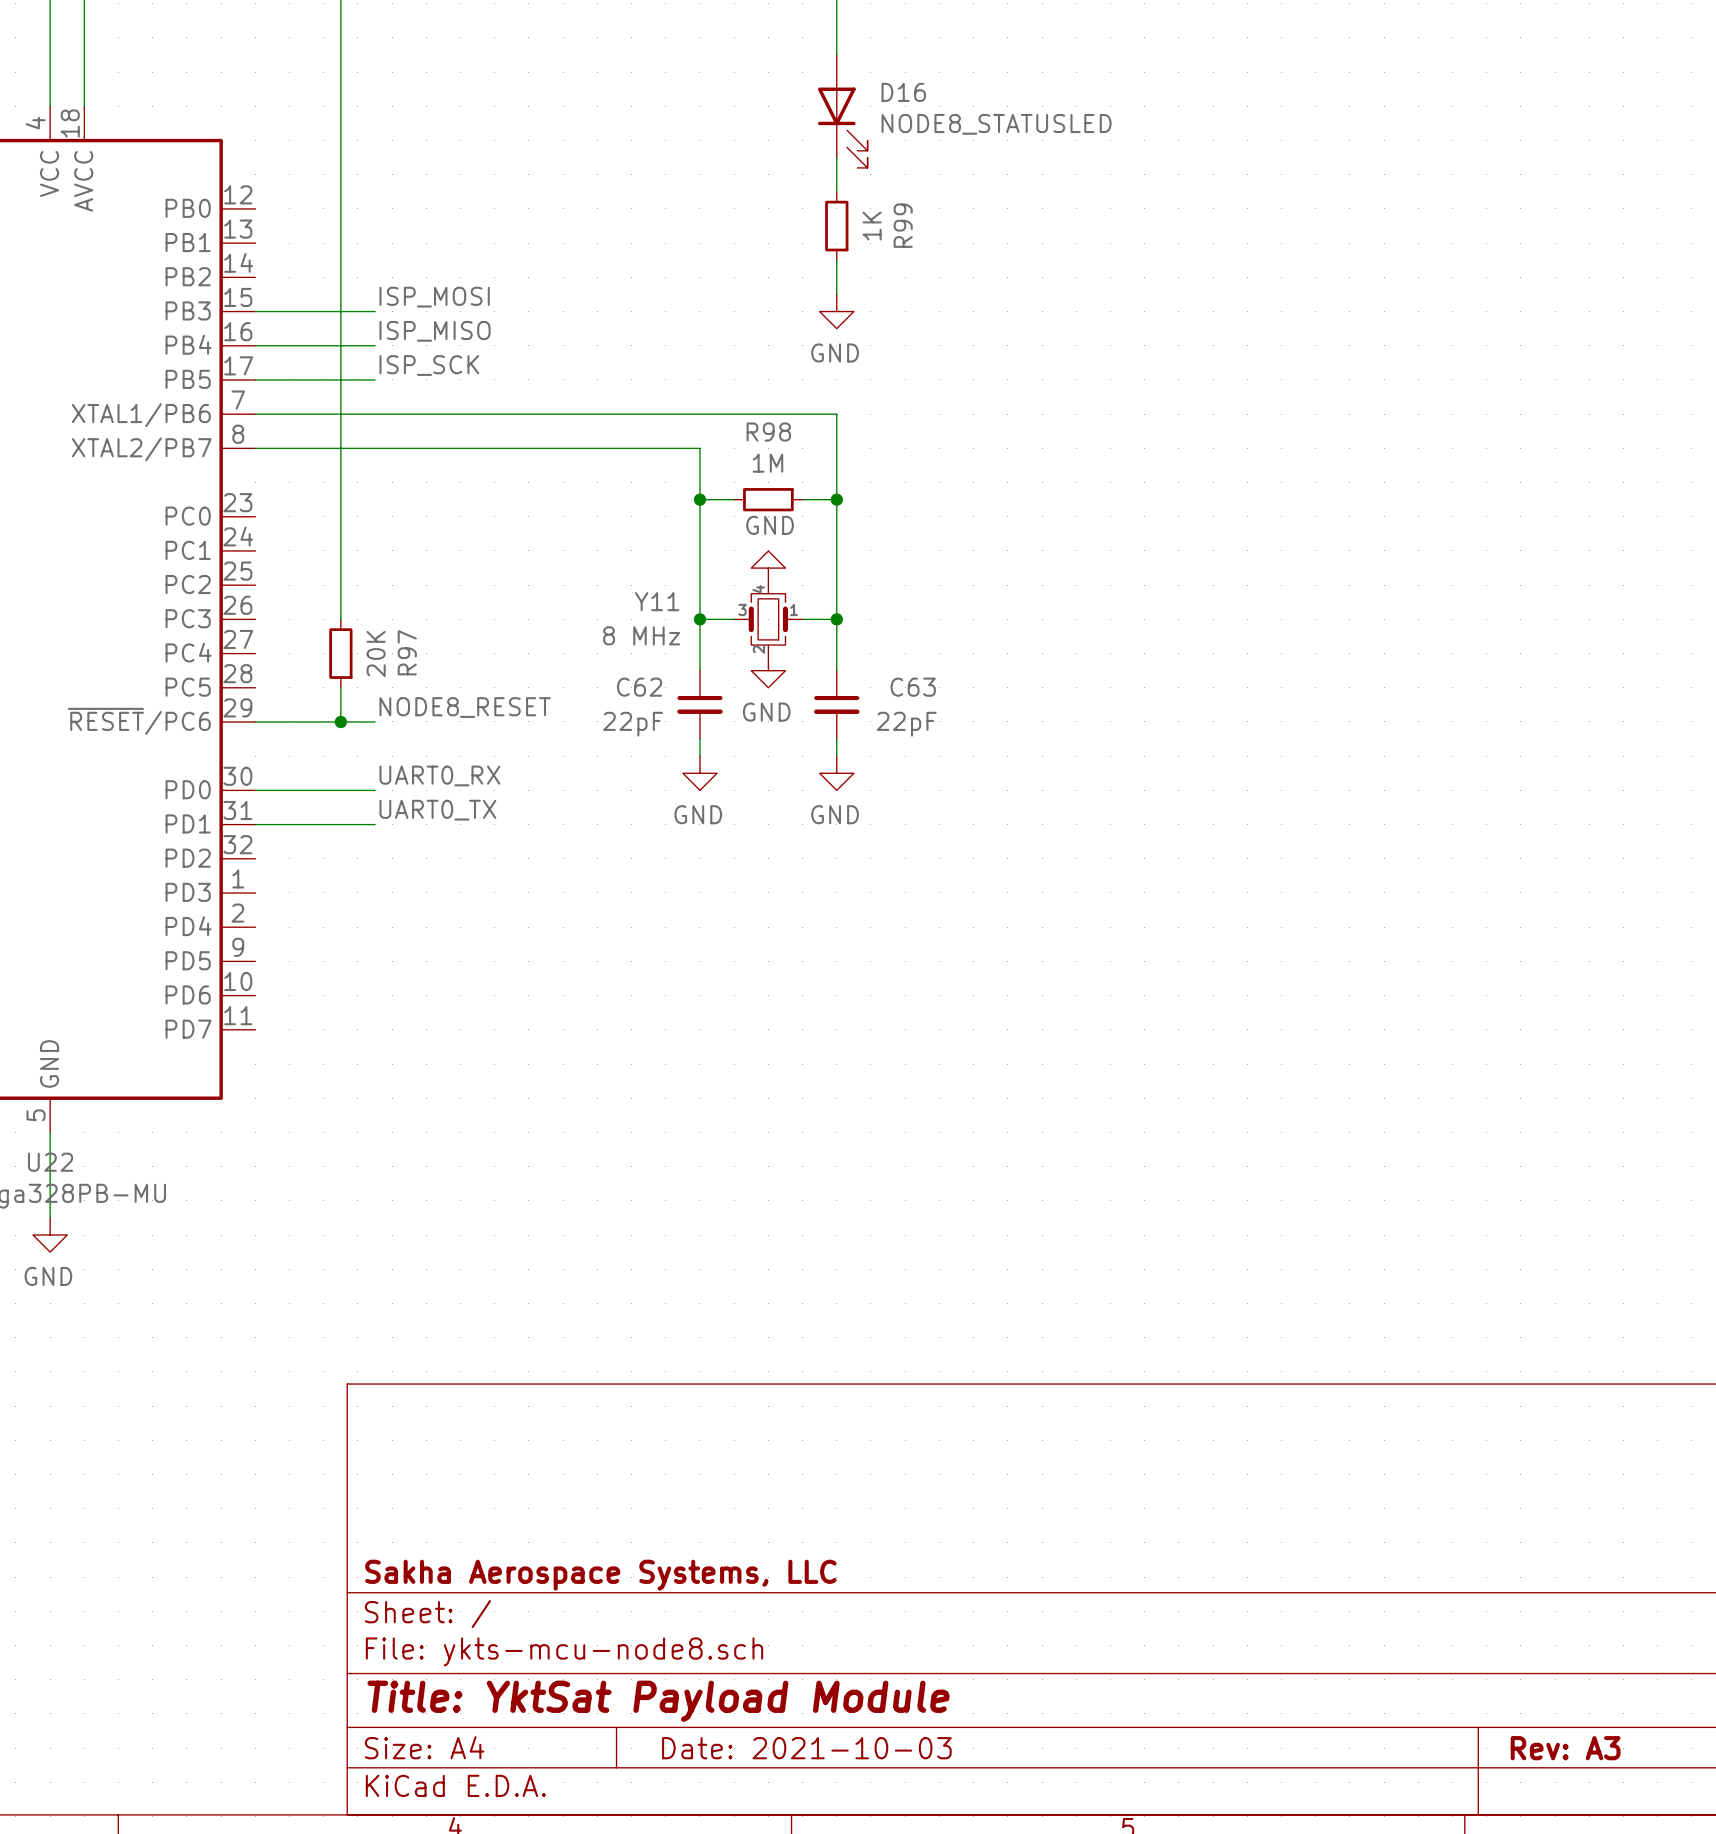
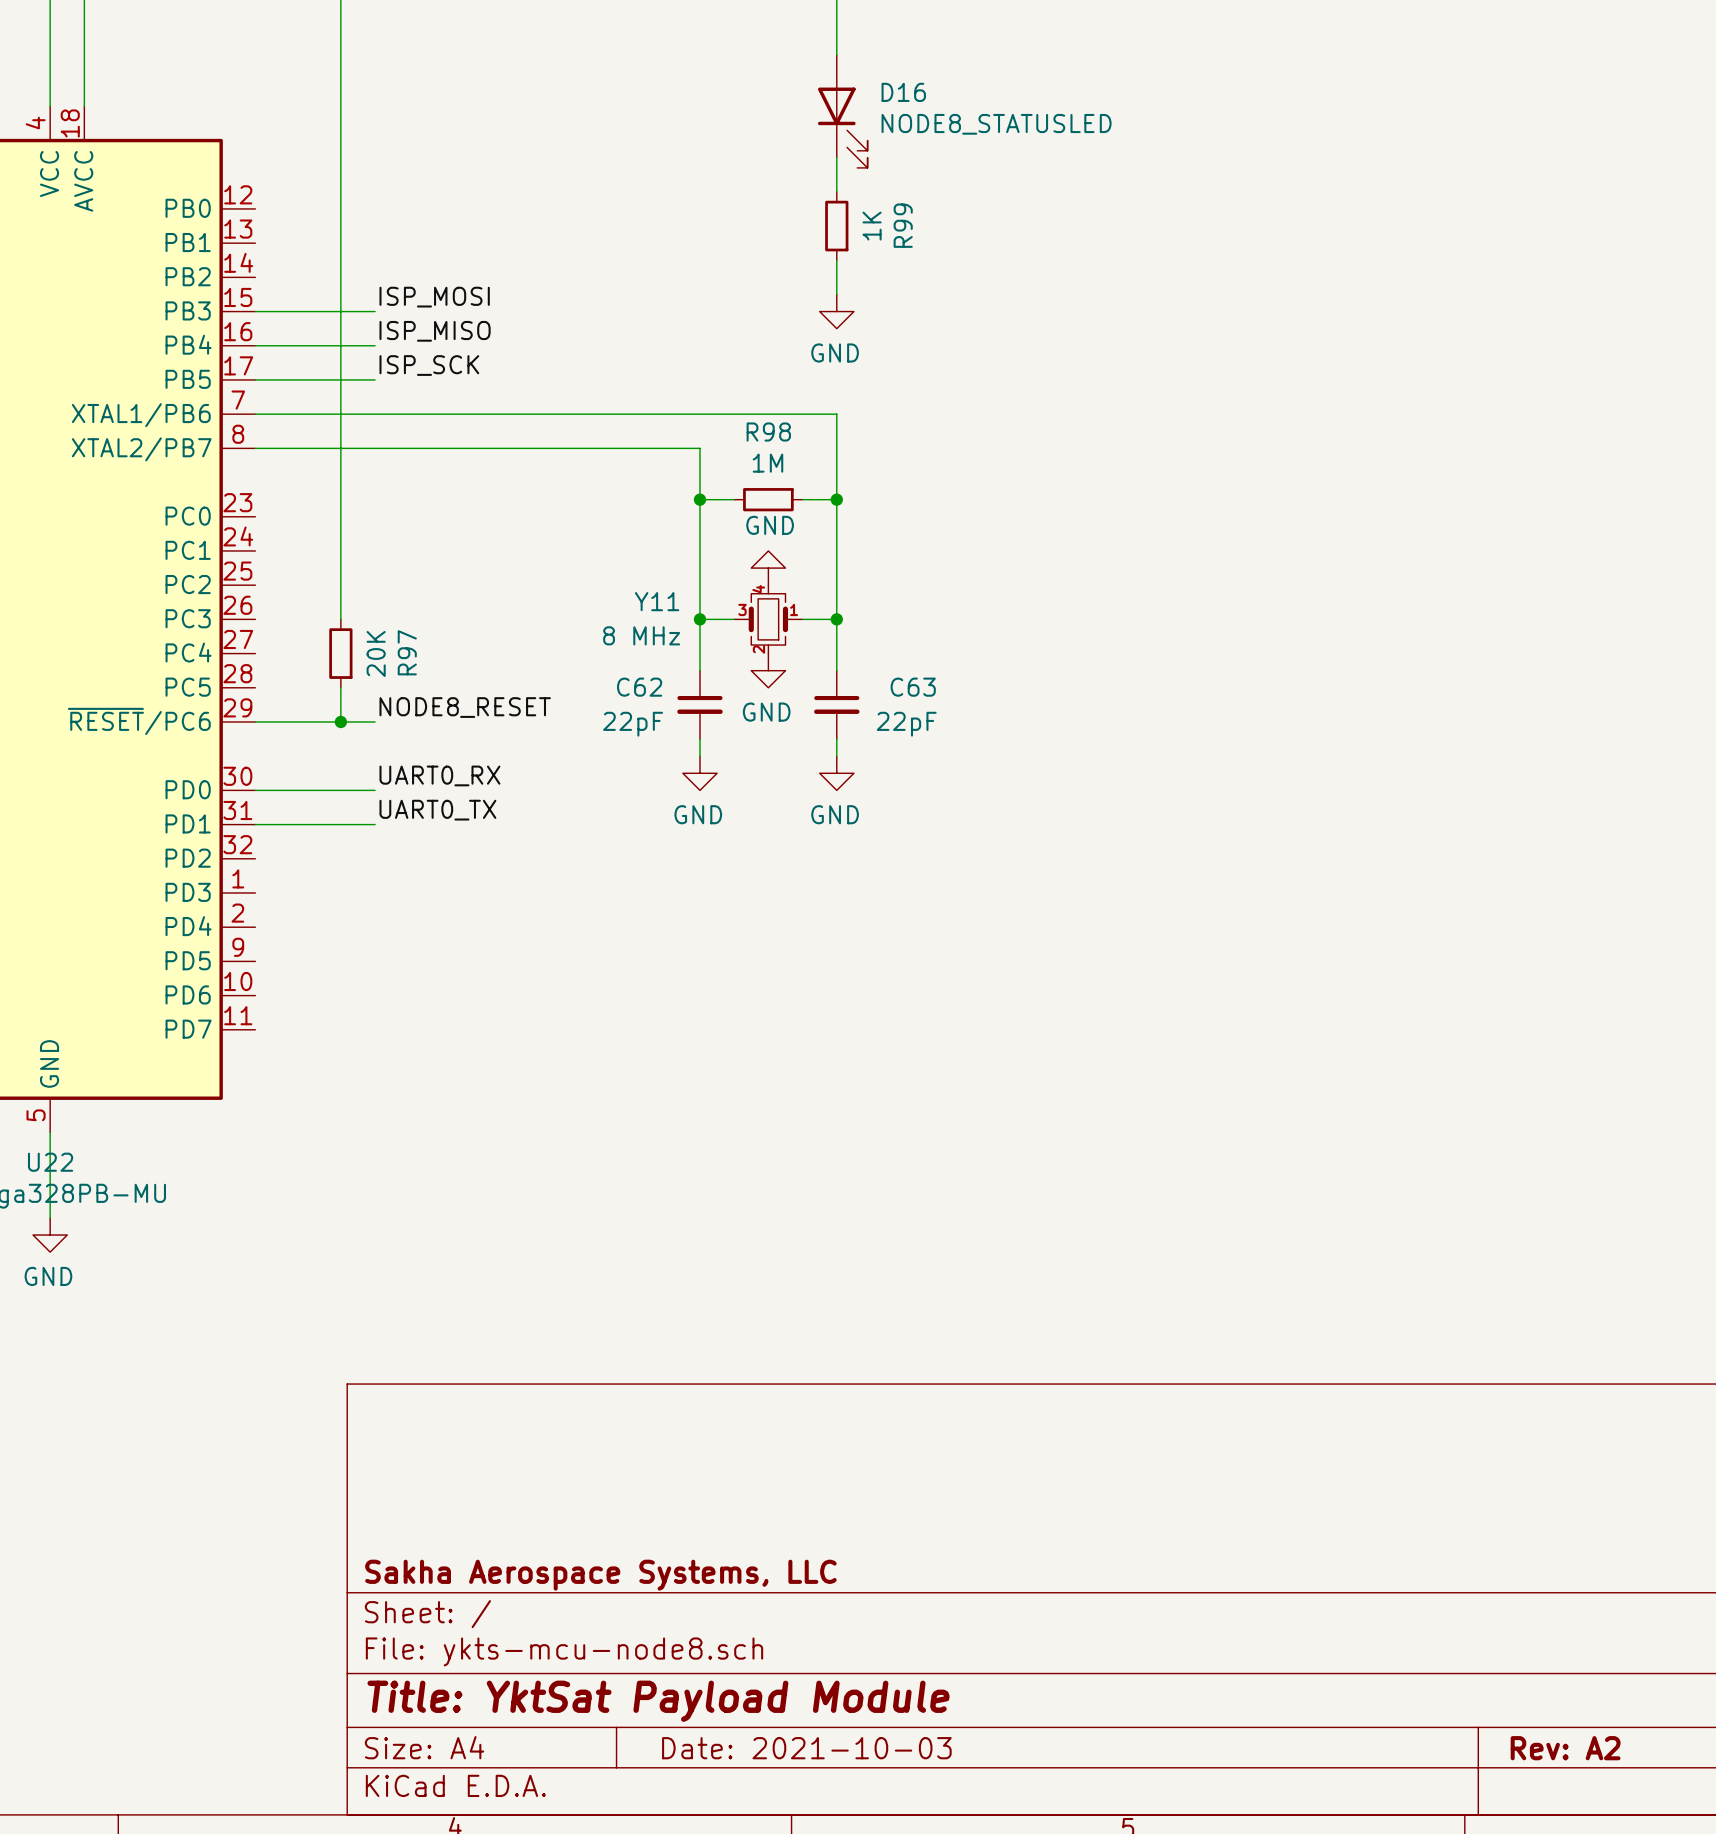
title block: Rev: A3 (1565, 1748) -> Rev: A2 (1565, 1748)

